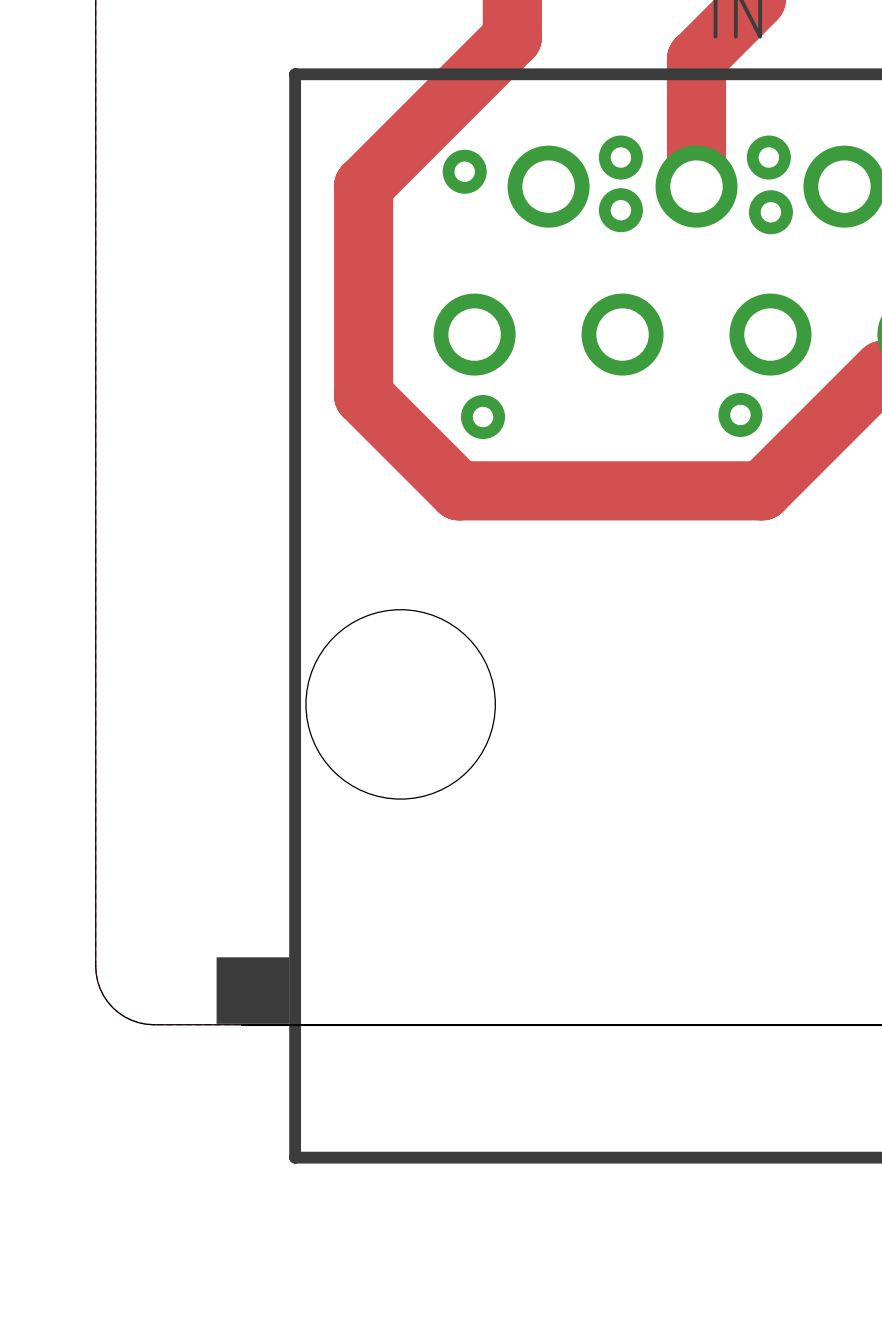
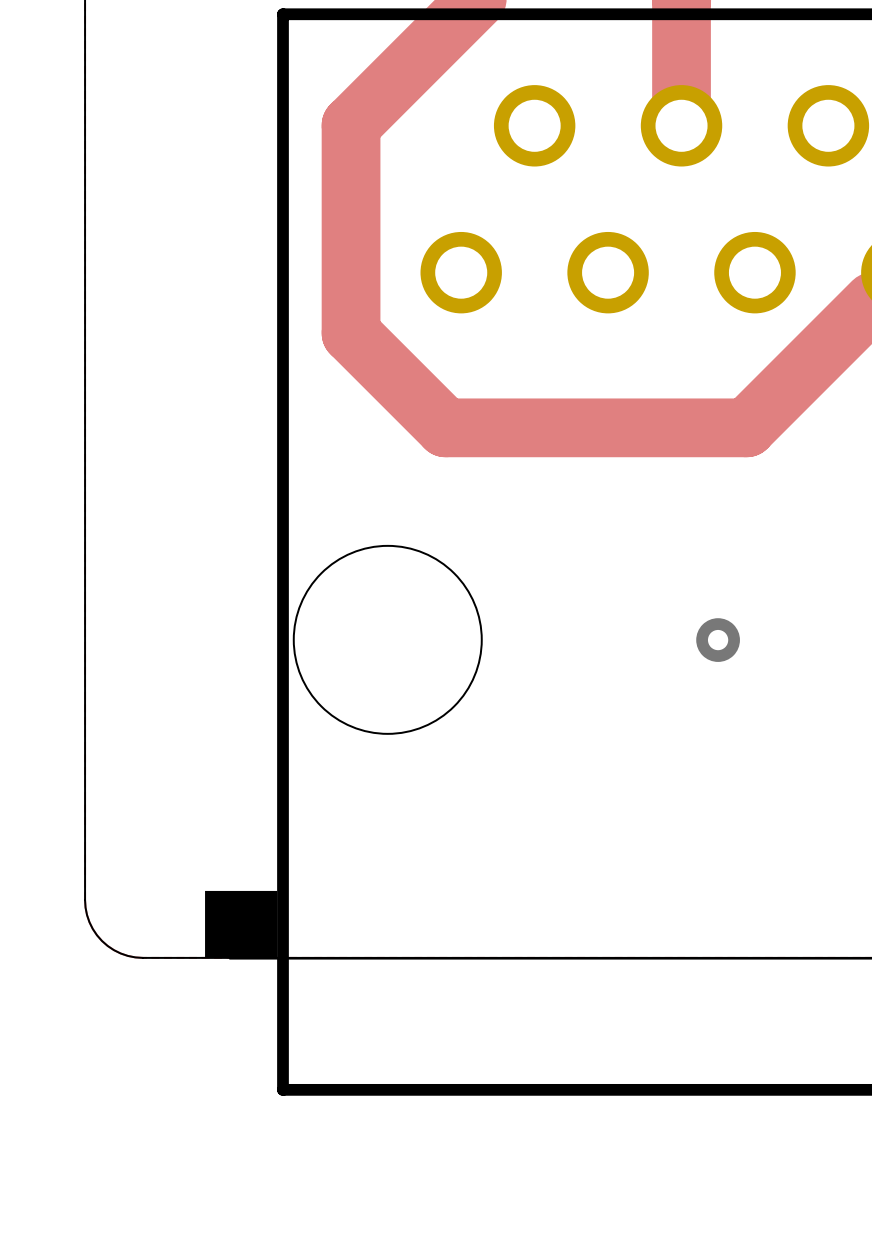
via: (620, 157) -> none
via: (768, 157) -> none
via: (464, 171) -> none
via: (620, 210) -> none
via: (770, 212) -> none
via: (740, 414) -> none
via: (483, 417) -> none
via: none -> (718, 640)

